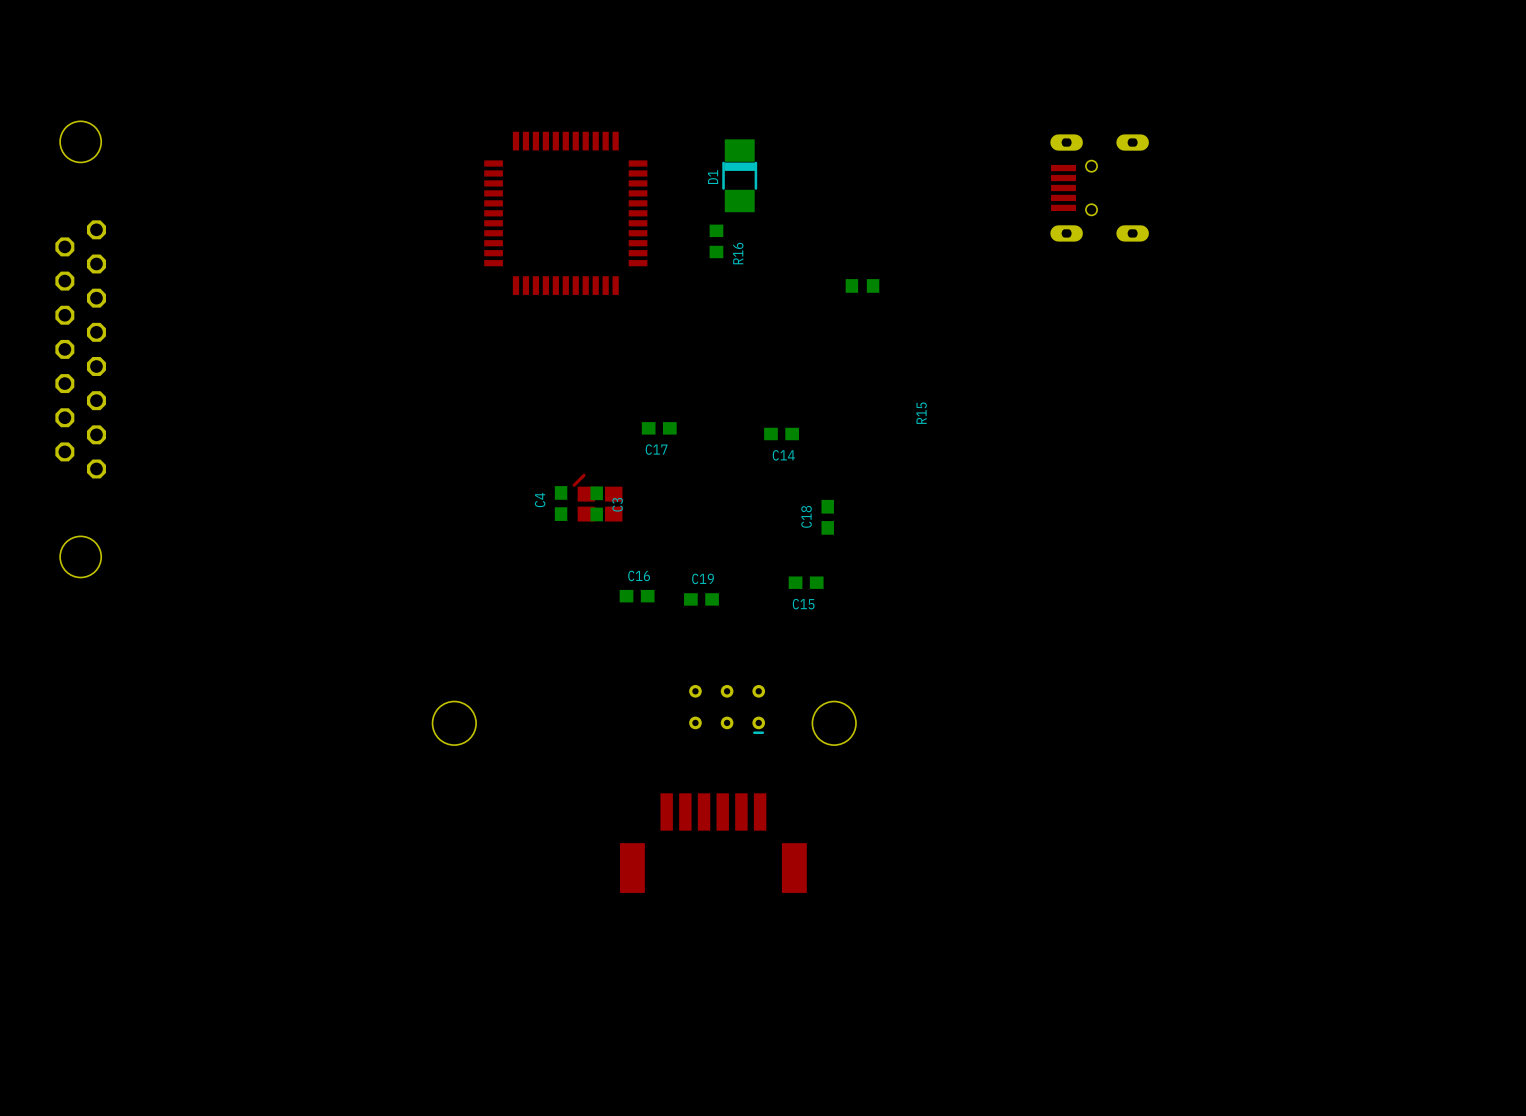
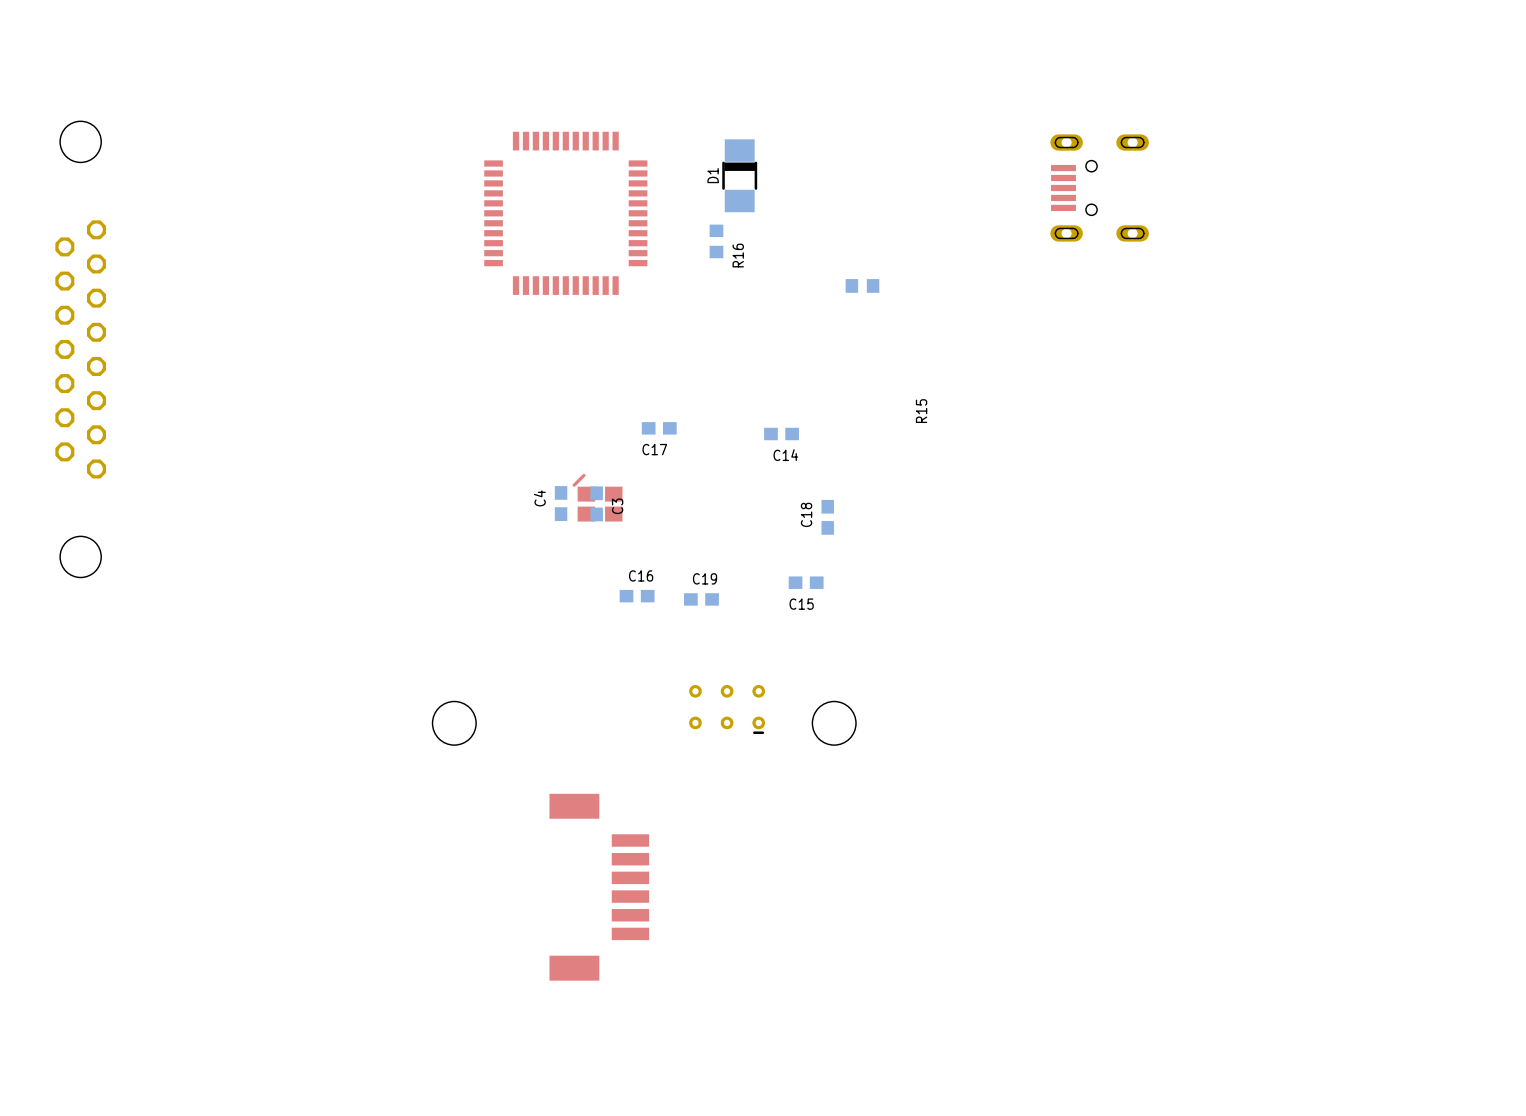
part rotation: 0° (713, 843) -> 90° clockwise (599, 887)
part position: (713, 843) -> (599, 887)

